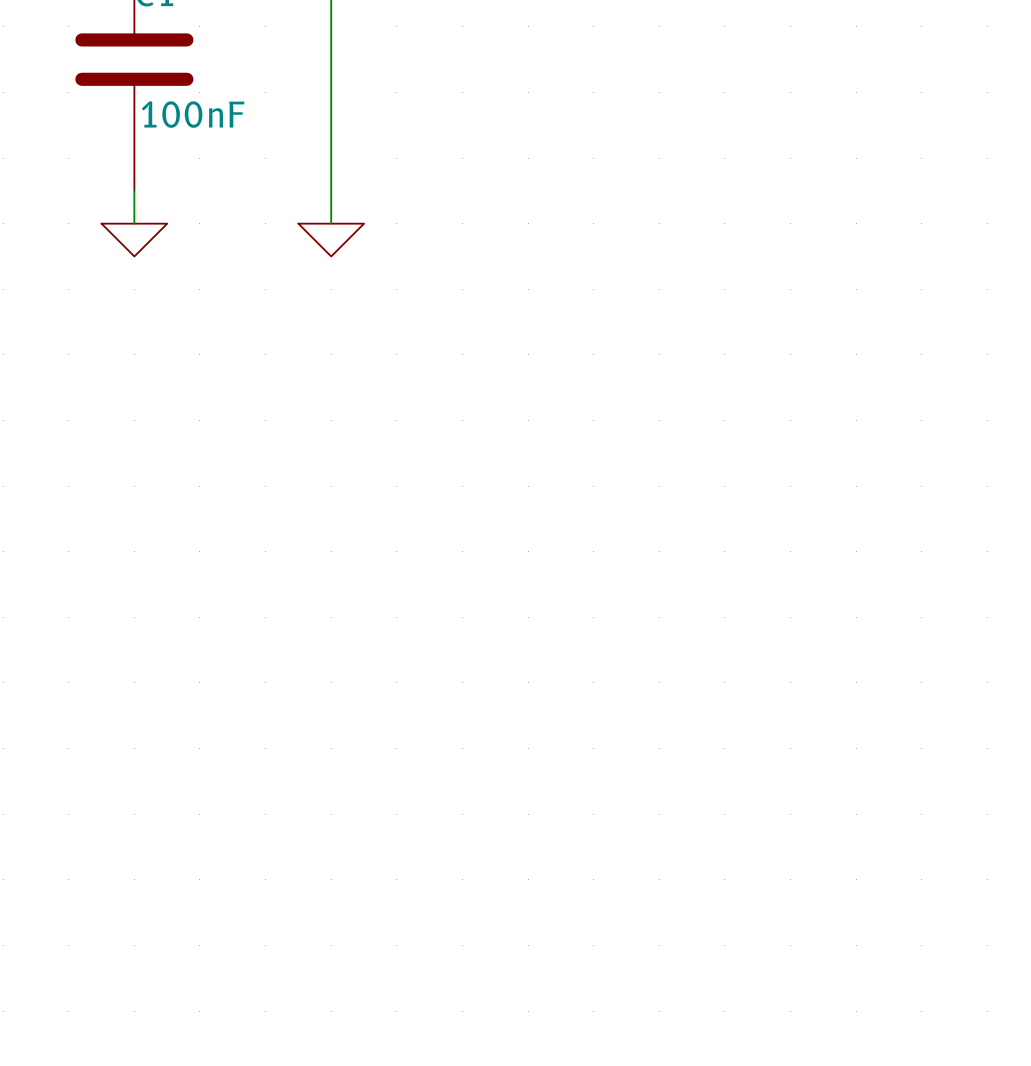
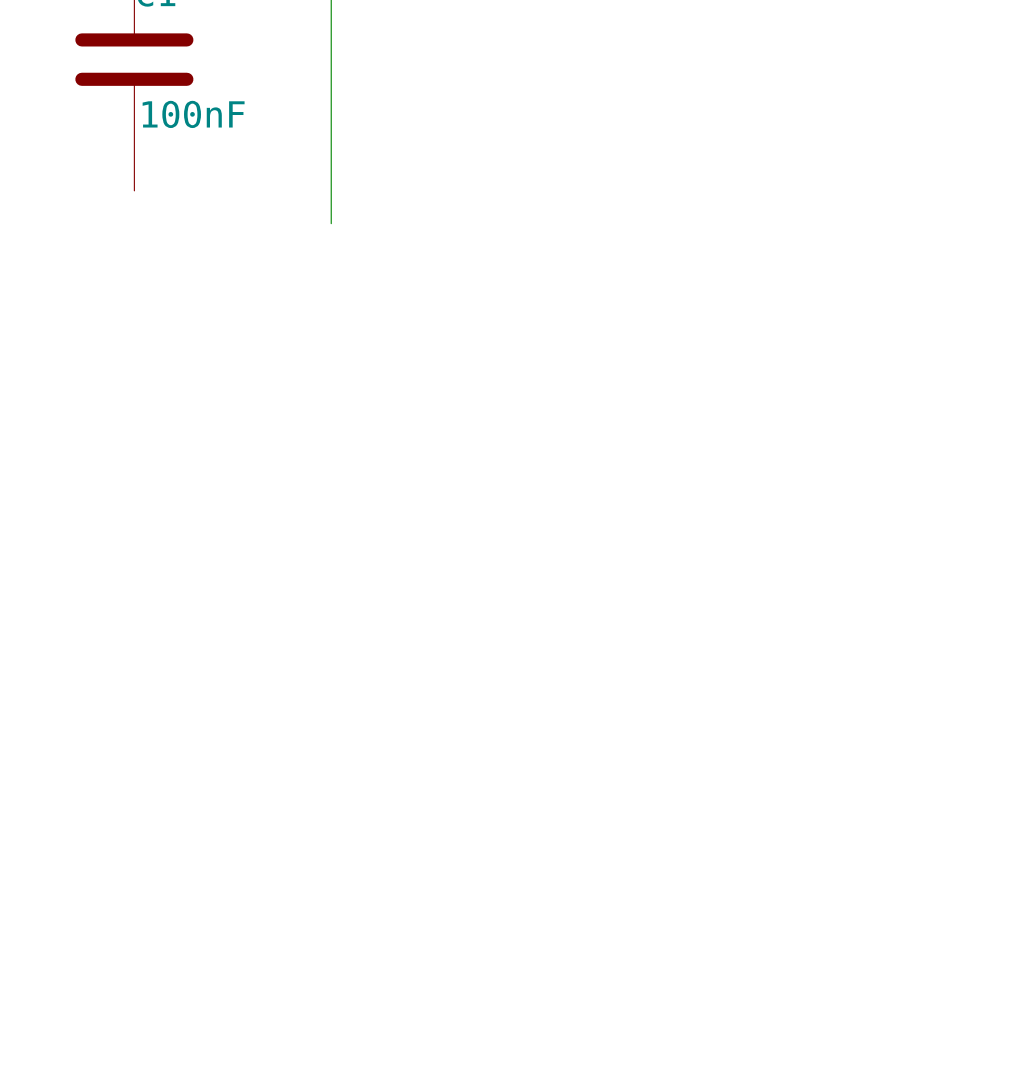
wire: (134, 190) (134, 223) -> none
power symbol: (134, 240) -> none
power symbol: (331, 240) -> none

